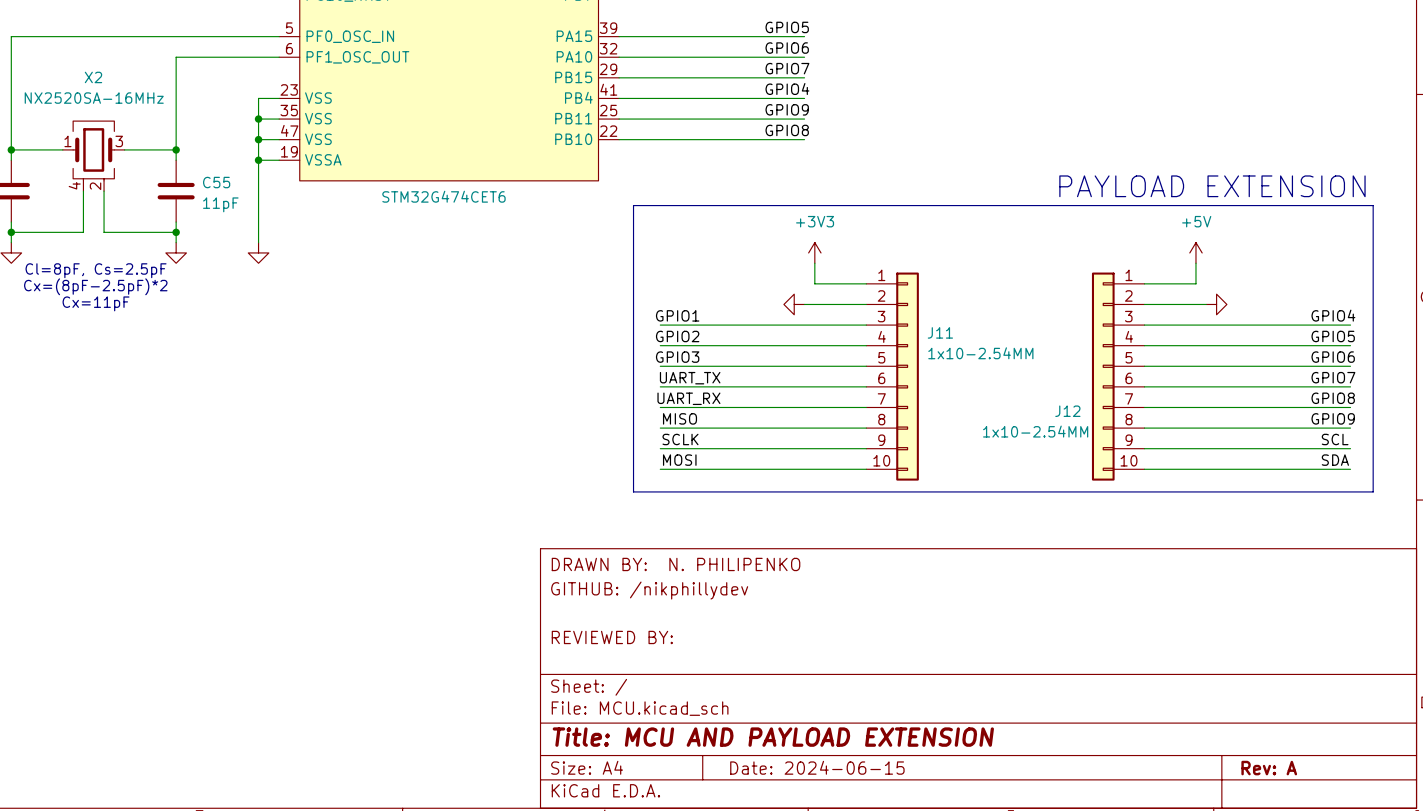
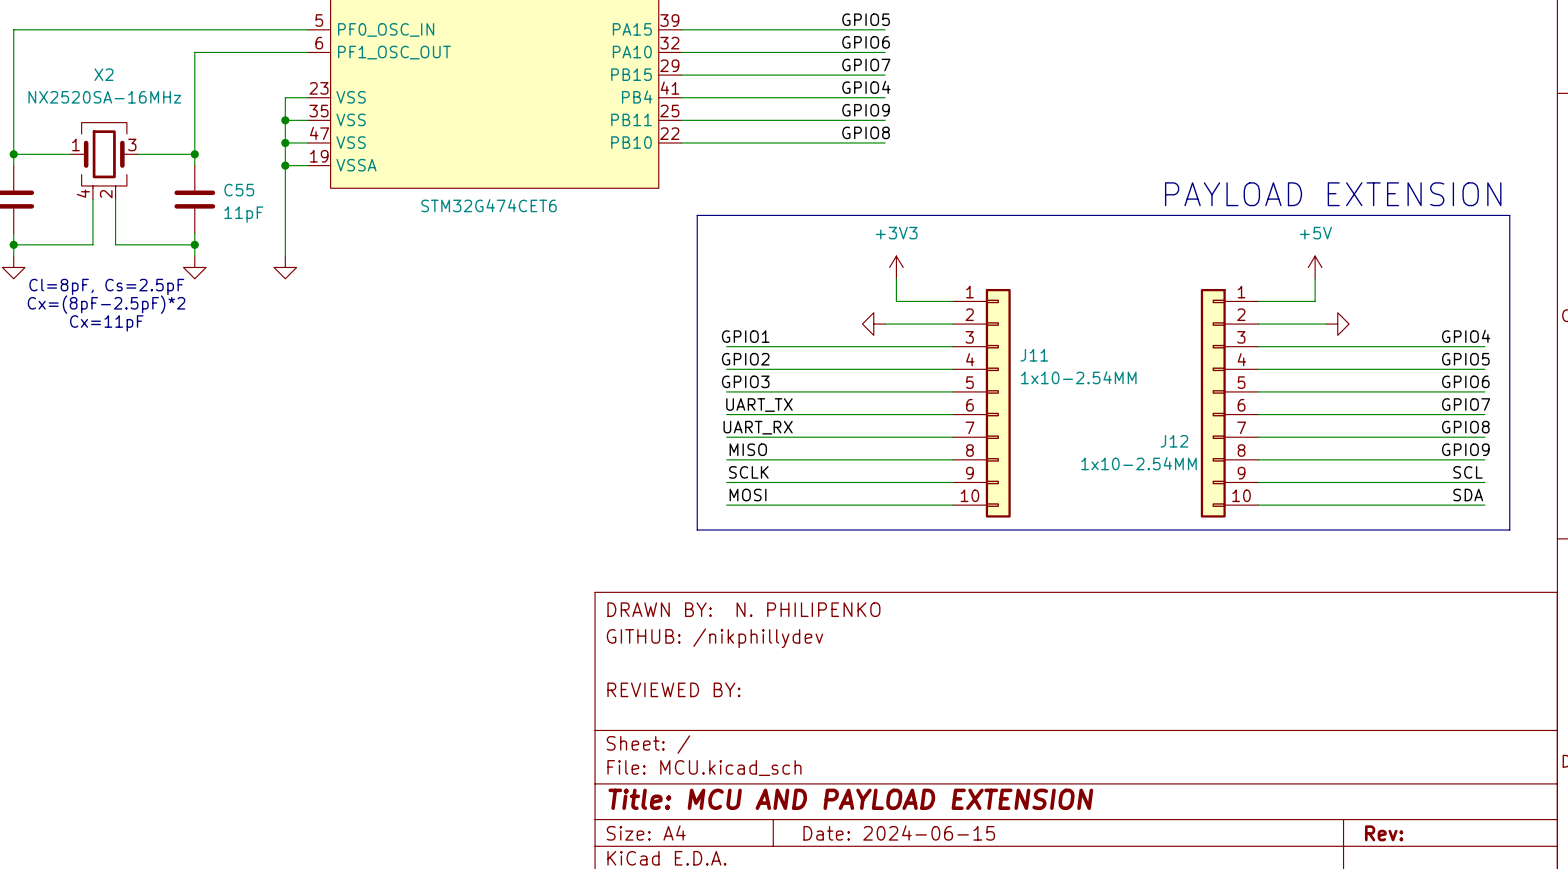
title block: Rev: A (1269, 768) -> Rev: (1384, 833)

